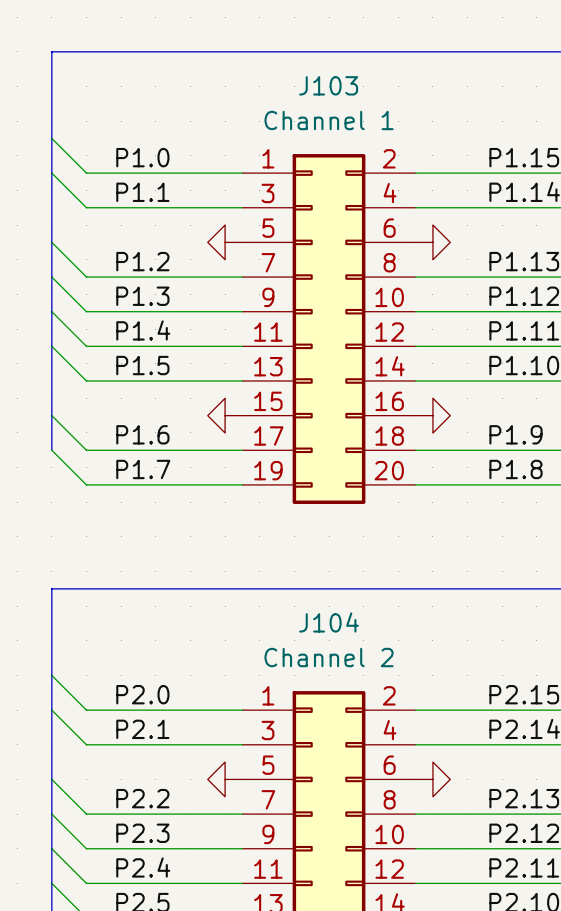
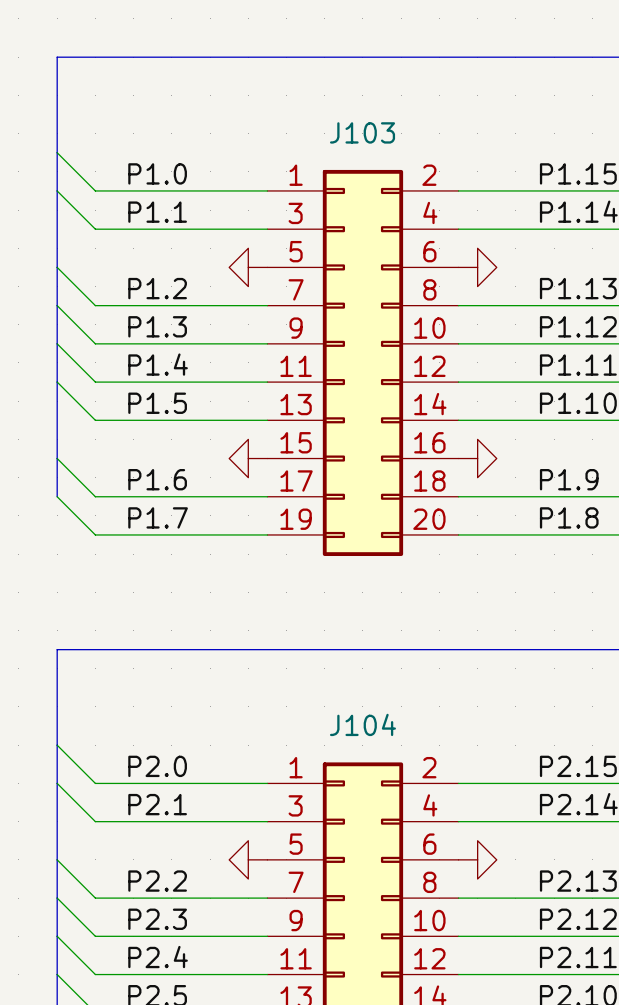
J103 name position: J103 (328, 85) -> J103 (362, 132)
J103 value: Channel 1 (329, 120) -> none
J104 name position: J104 (329, 622) -> J104 (362, 724)
J104 value: Channel 2 (329, 657) -> none

